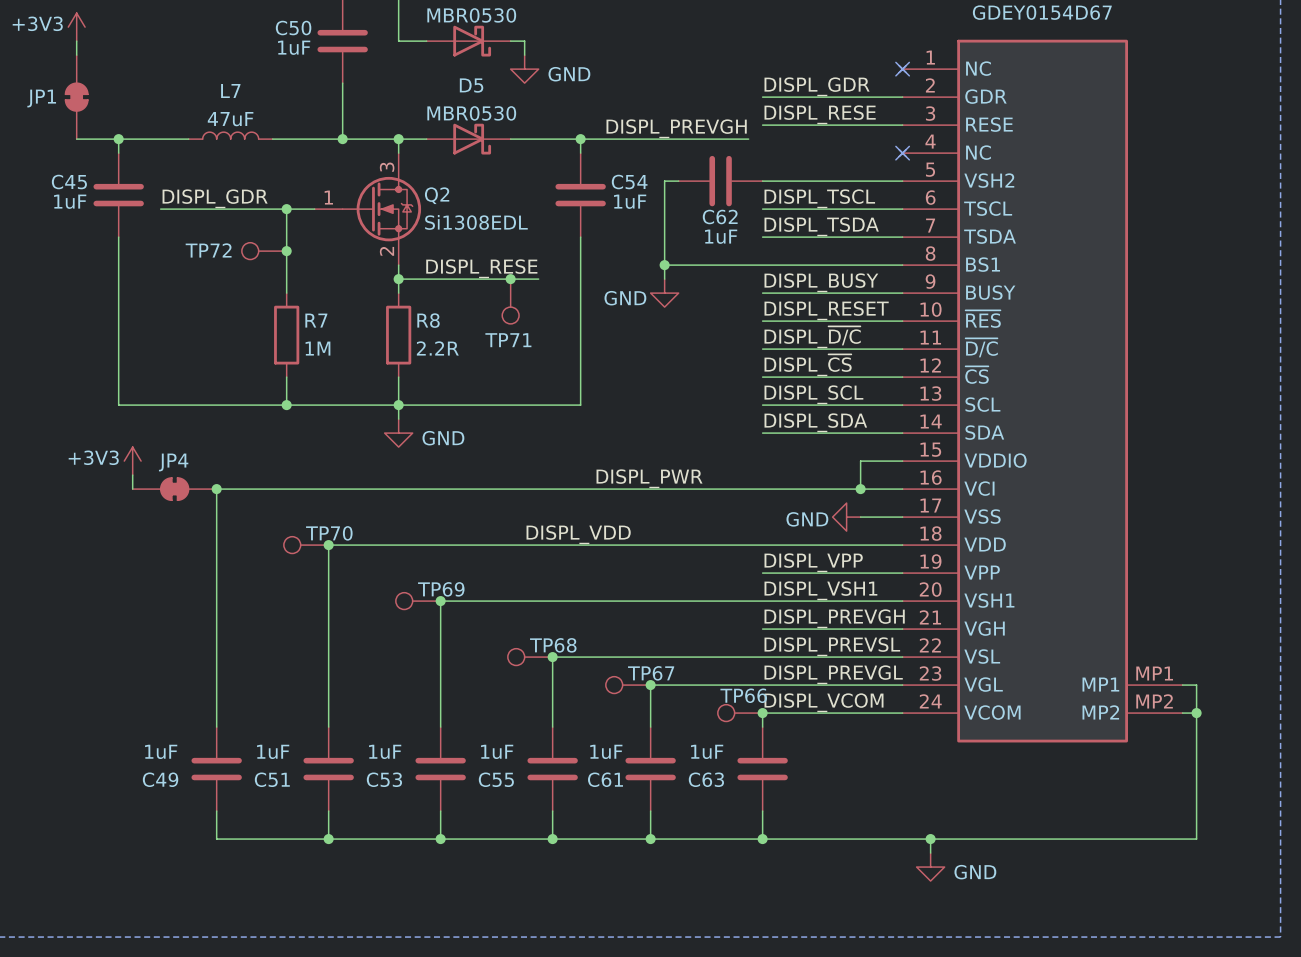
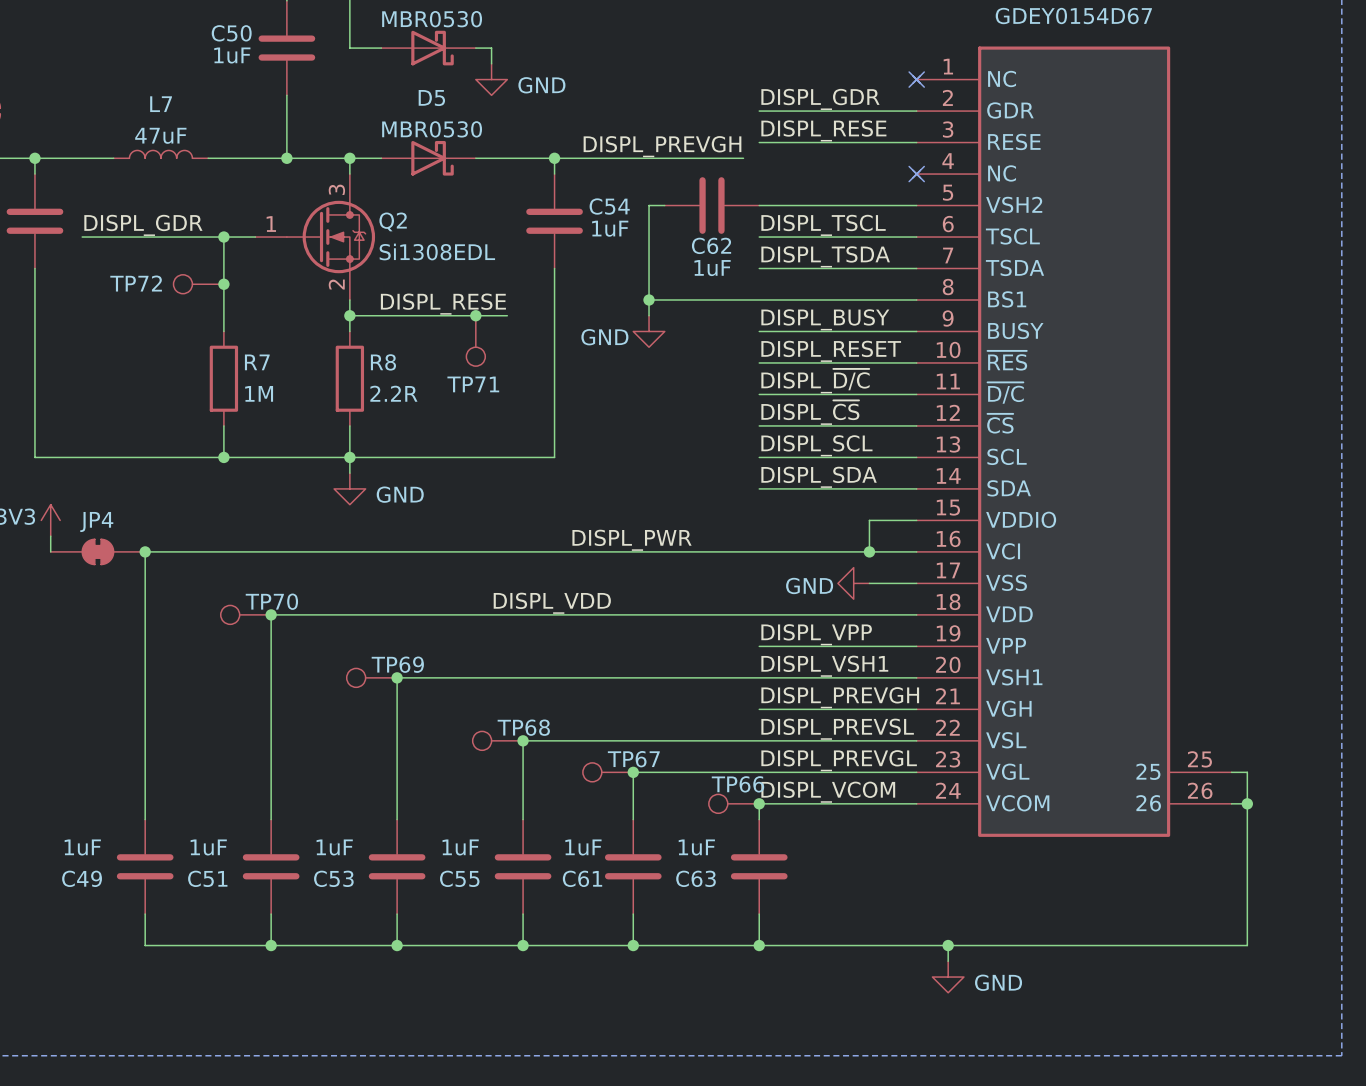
part pin number: MP1 (1154, 673) -> 25 (1199, 759)
part pin name: MP1 (1100, 684) -> 25 (1148, 771)
part pin number: MP2 (1154, 701) -> 26 (1200, 790)
part pin name: MP2 (1100, 712) -> 26 (1148, 803)

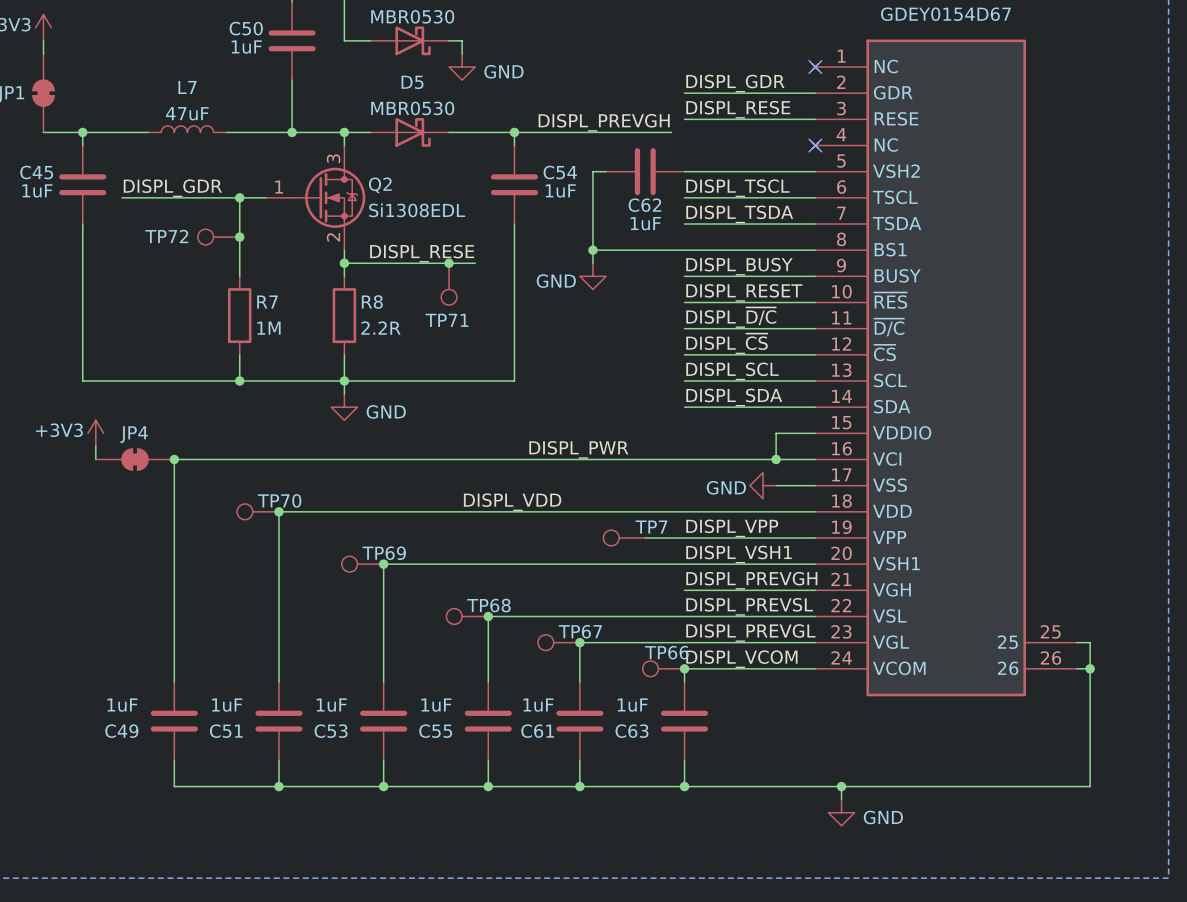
TP7: none -> (624, 537)
wire: none -> (645, 537) (684, 537)

